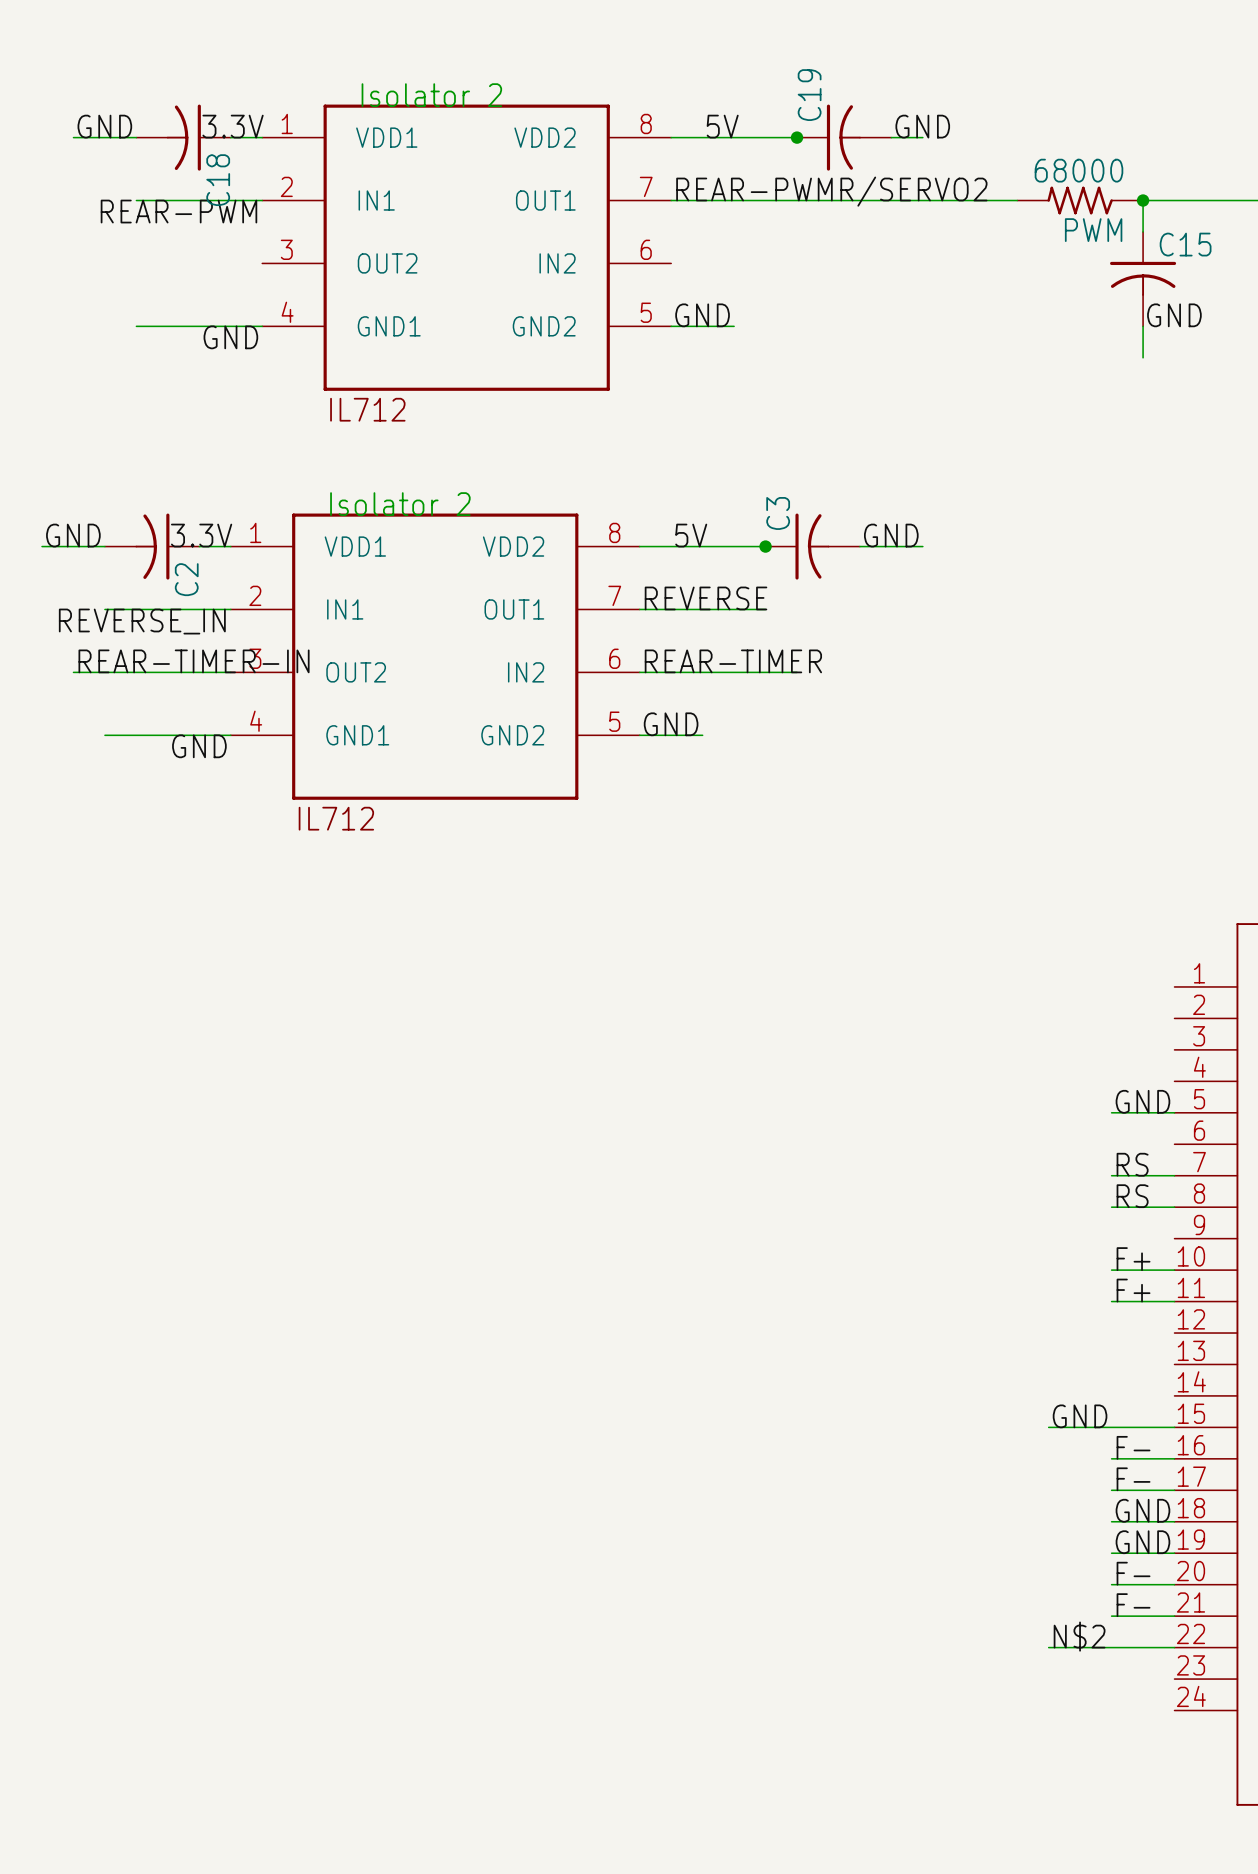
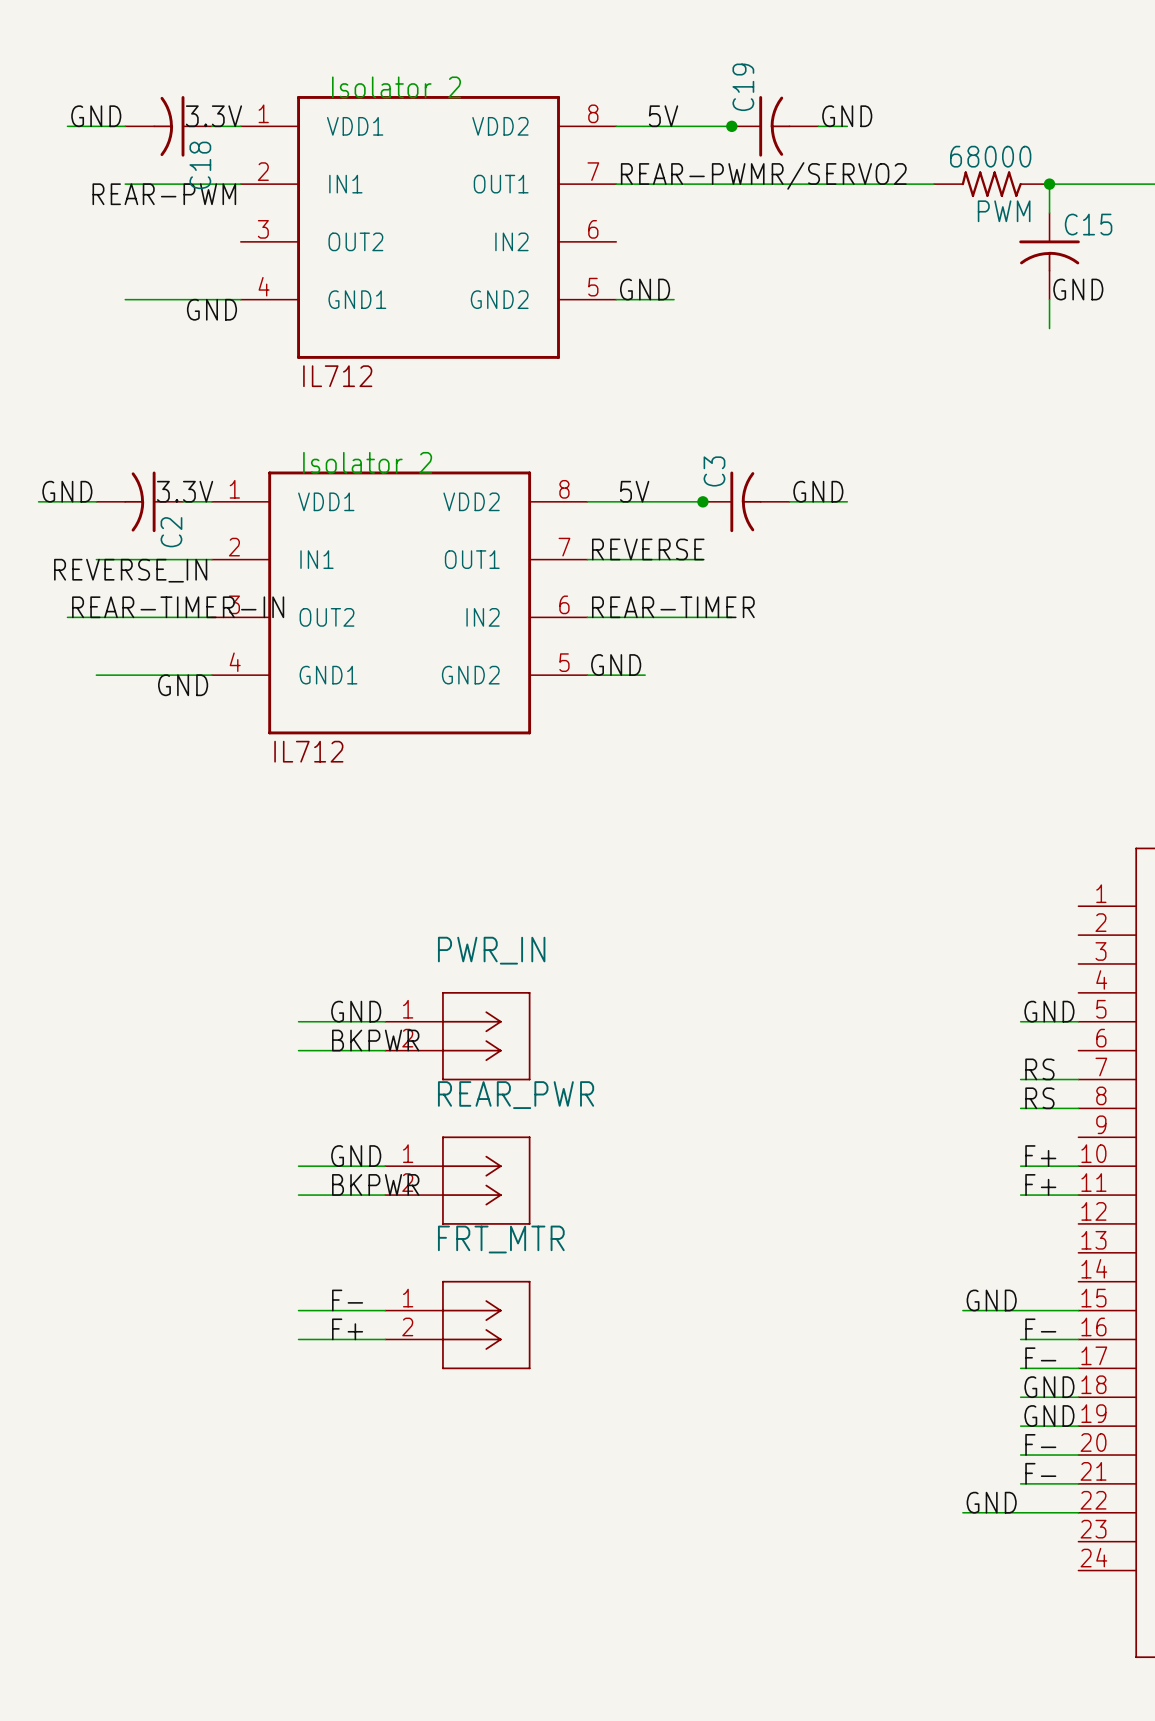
label: none -> GND (356, 1011)
wire: none -> (298, 1021) (385, 1021)
PWR_IN: none -> (457, 1036)
label: none -> BKPWR (375, 1040)
wire: none -> (298, 1050) (385, 1050)
label: none -> GND (356, 1156)
wire: none -> (298, 1166) (385, 1166)
REAR_PWR: none -> (457, 1180)
label: none -> BKPWR (375, 1184)
wire: none -> (298, 1195) (385, 1195)
label: none -> F- (347, 1300)
wire: none -> (298, 1310) (385, 1310)
FRT_MTR: none -> (457, 1325)
label: none -> F+ (347, 1329)
wire: none -> (298, 1339) (385, 1339)
label: N$2 (1079, 1636) -> GND (991, 1502)

